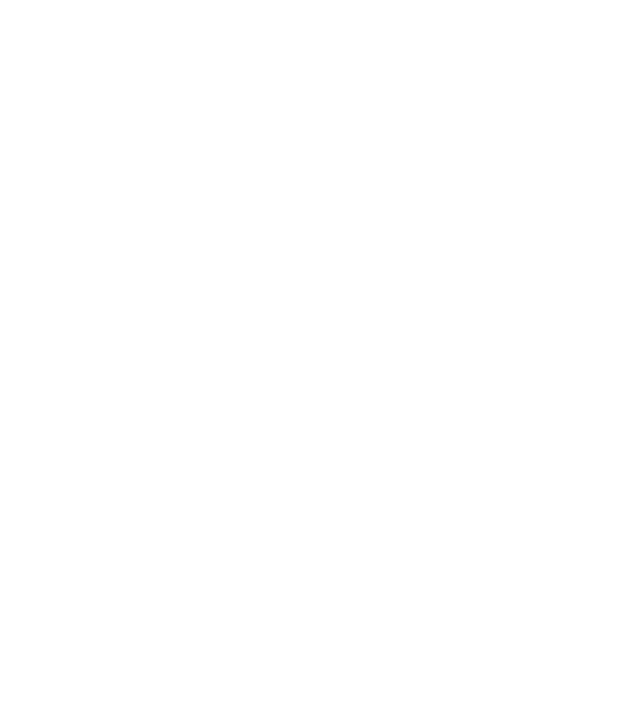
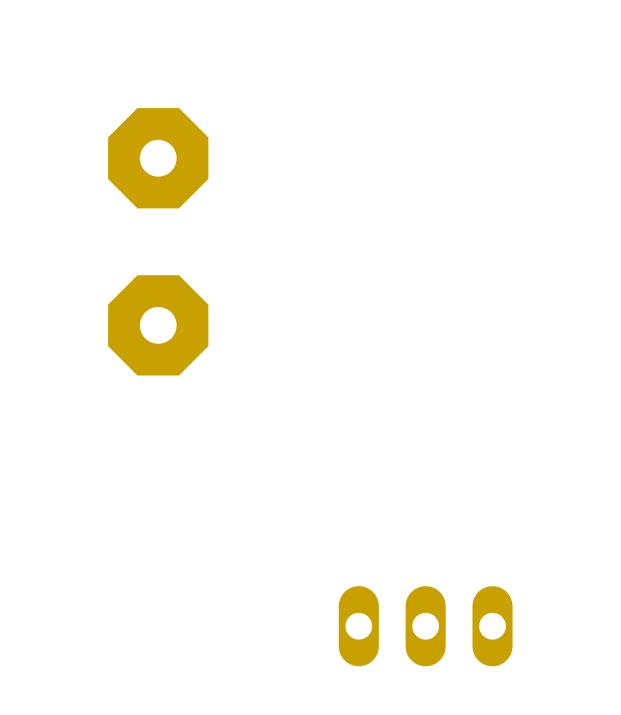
part: none -> (158, 158)
part: none -> (158, 325)
part: none -> (425, 626)

